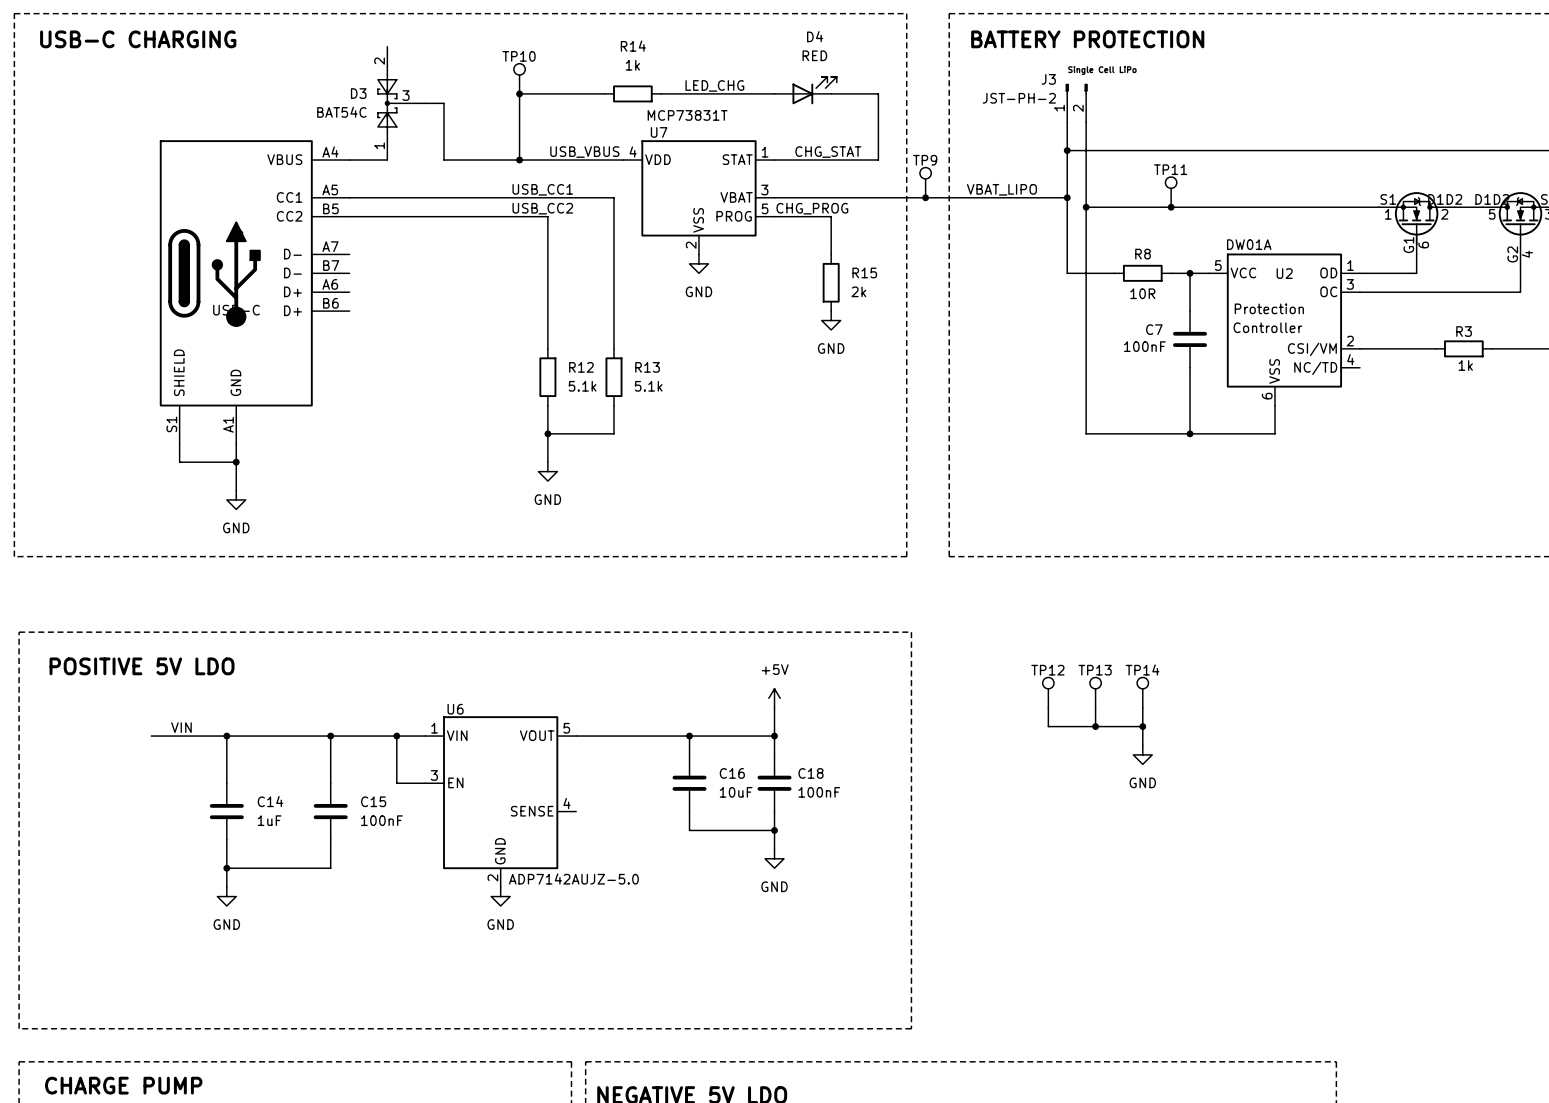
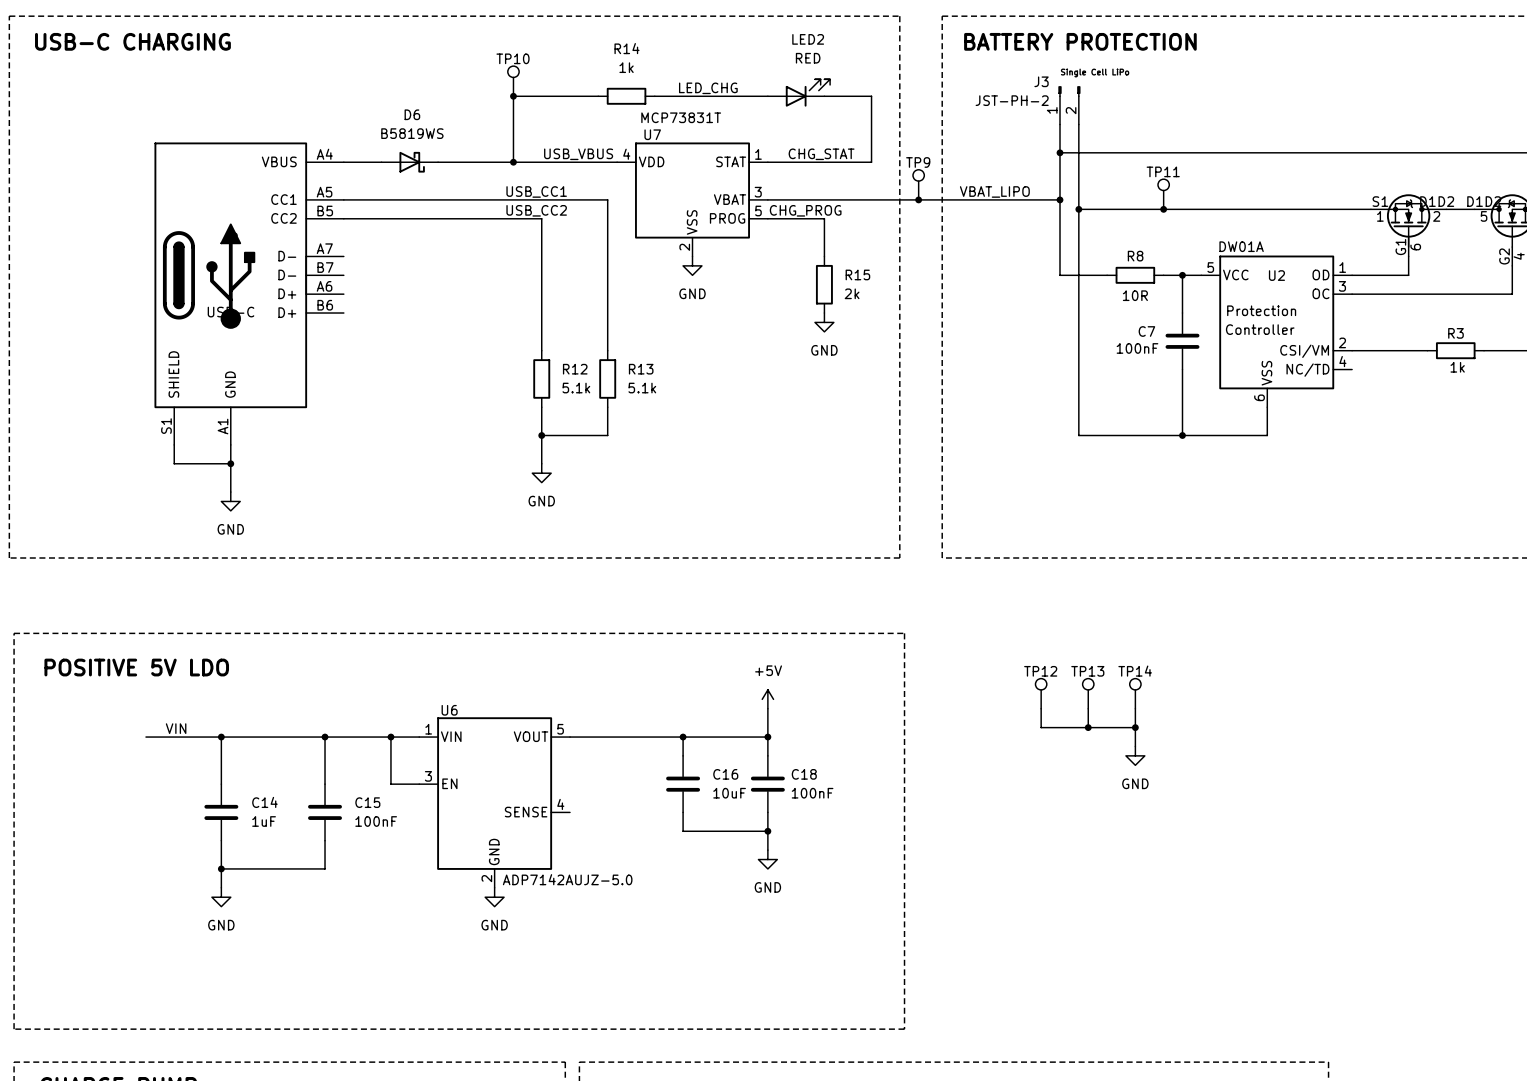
D4 name: D4 (815, 36) -> LED2 (808, 39)
D3: BAT54C (401, 103) -> none
wire: (425, 103) (444, 103) (444, 160) -> none
D6: none -> B5819WS (409, 162)

